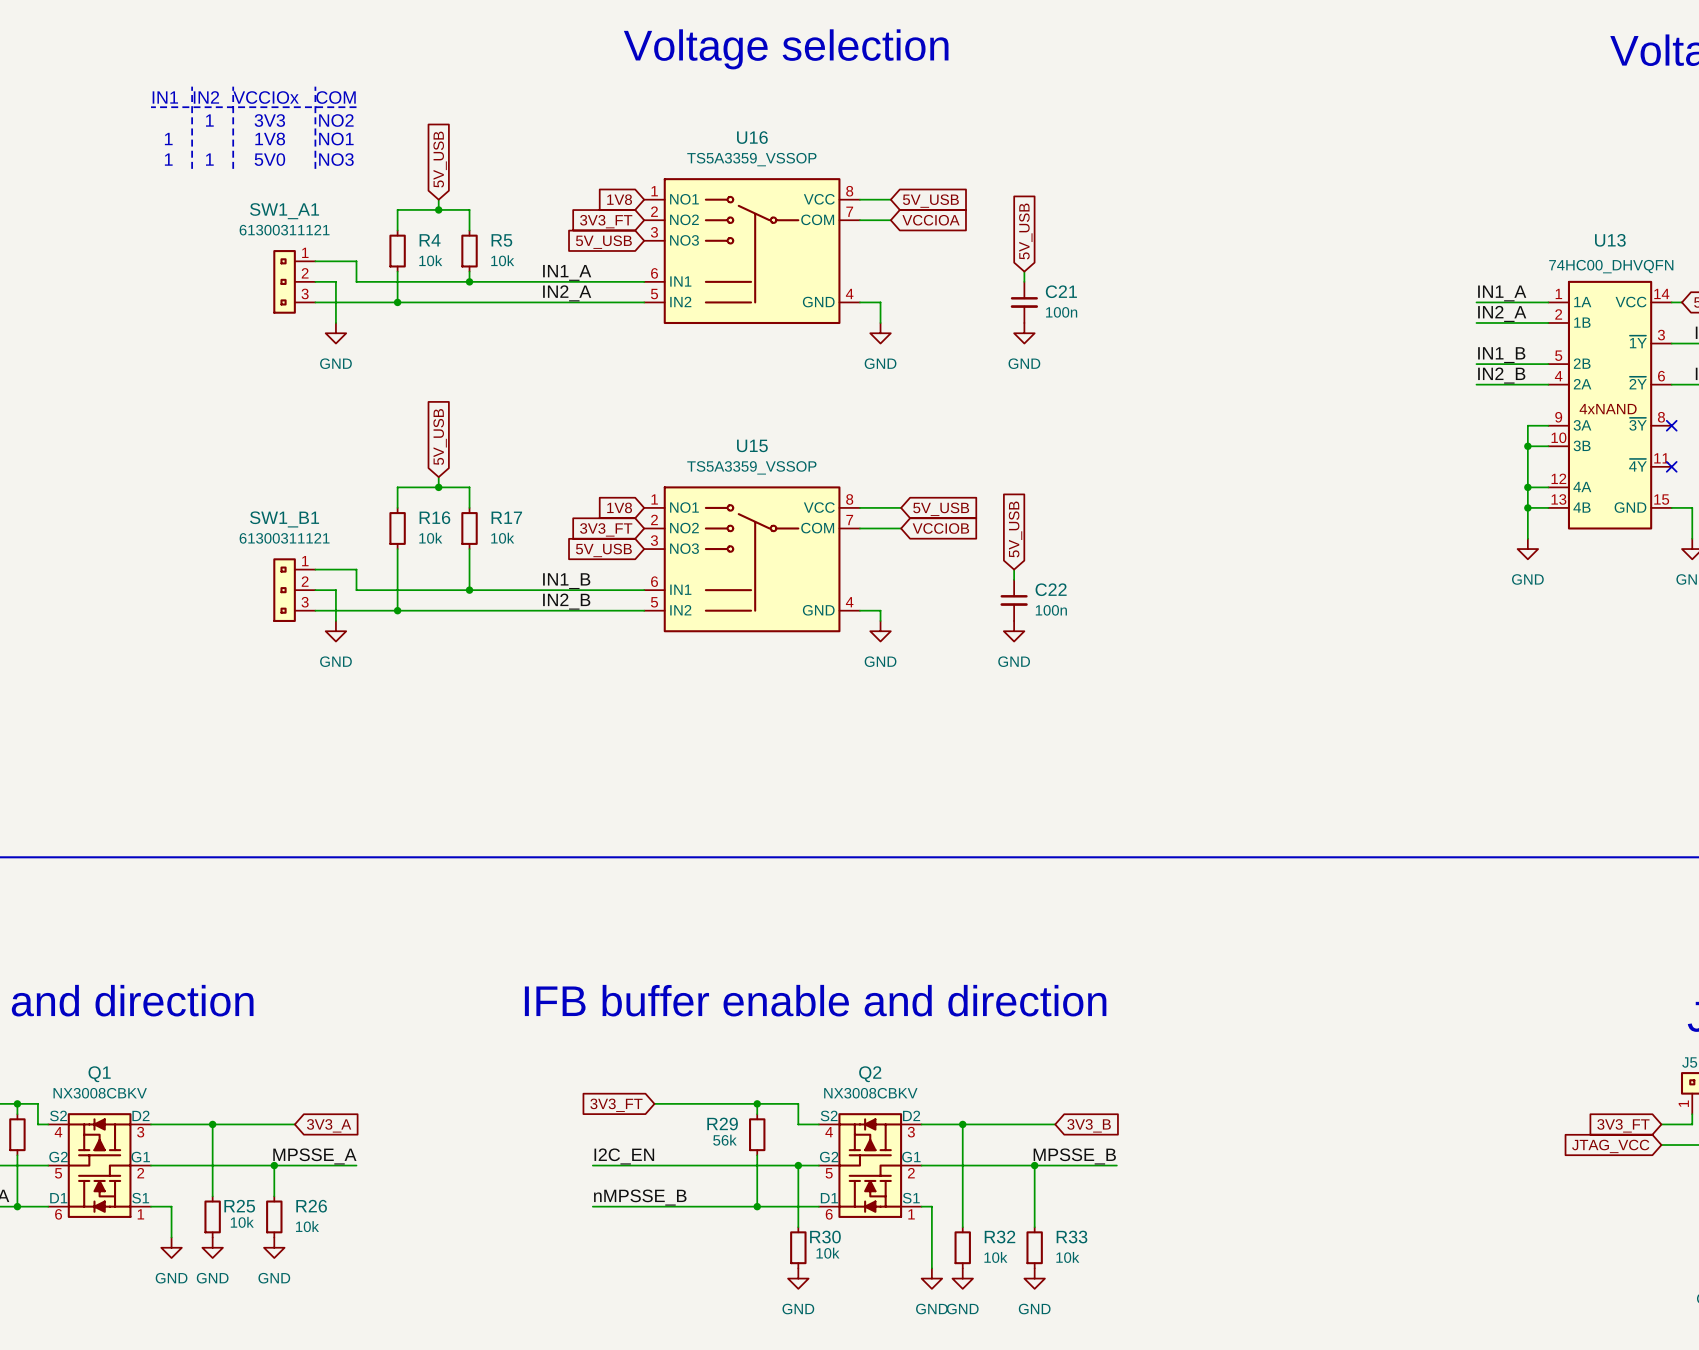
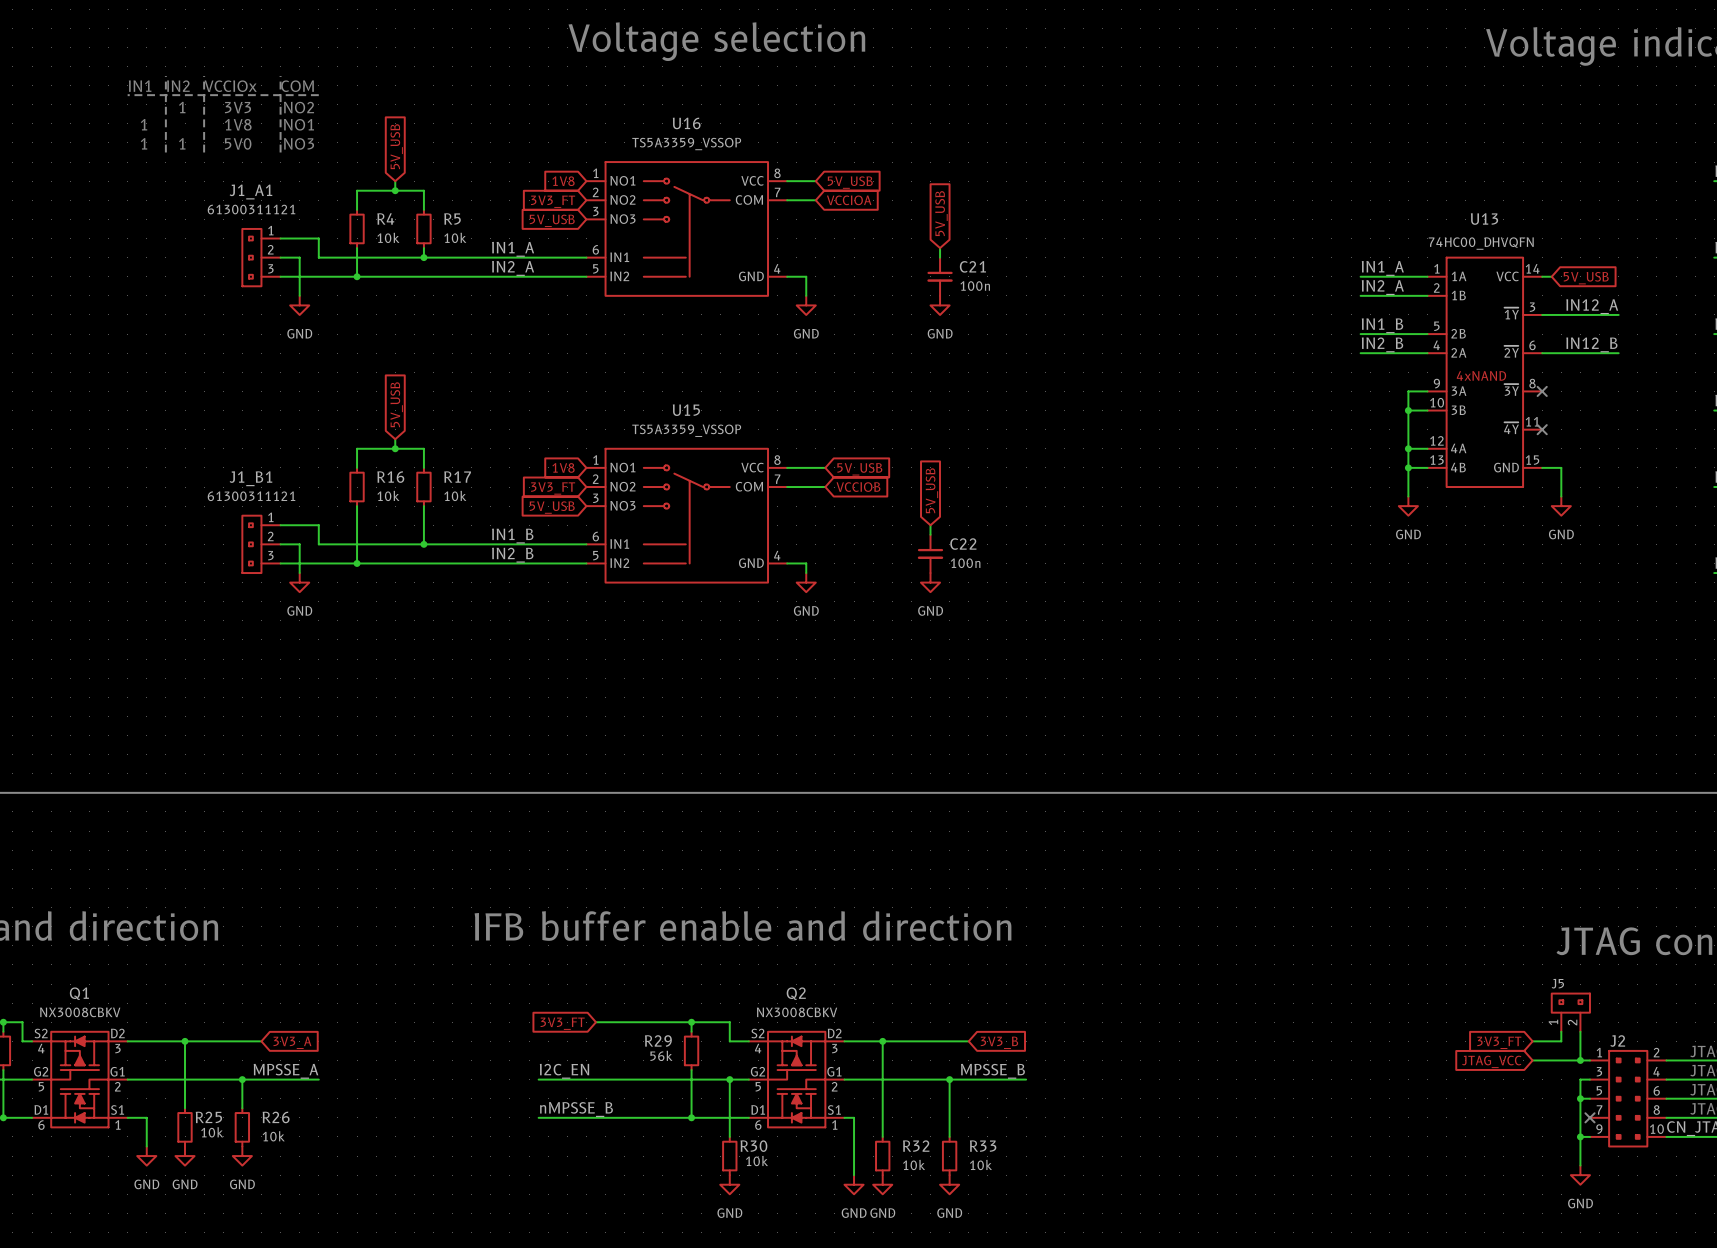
SW1_A1 name: SW1_A1 (284, 211) -> J1_A1 (250, 192)
SW1_B1 name: SW1_B1 (284, 519) -> J1_B1 (250, 478)

